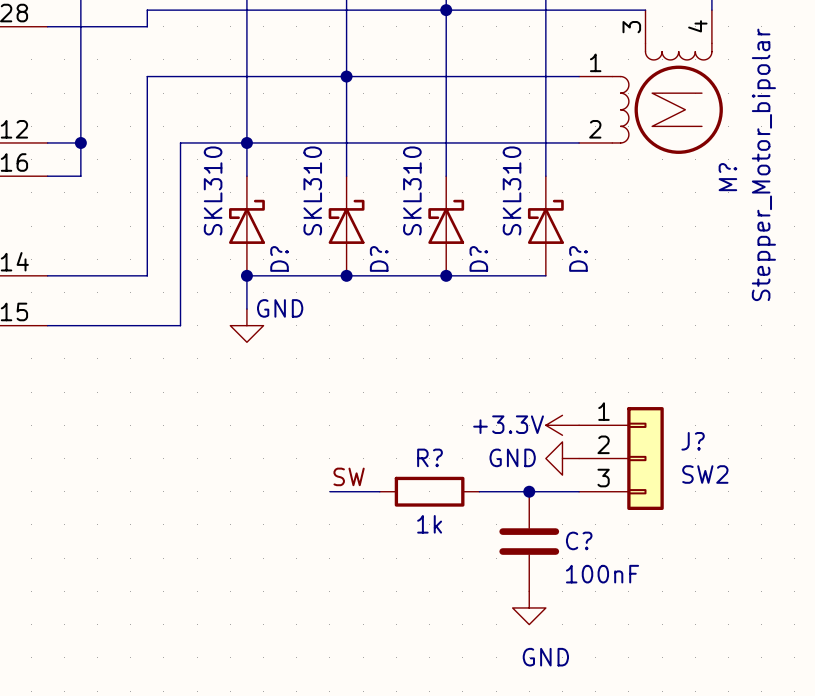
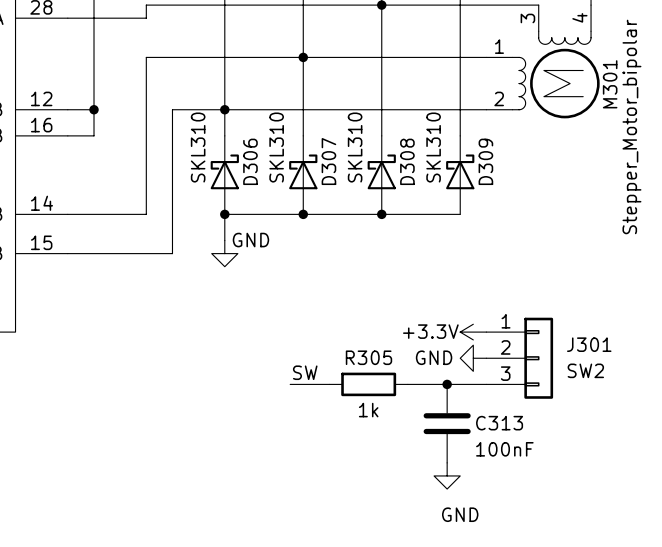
M? name: M? (727, 177) -> M301 (610, 84)
D? name: D? (279, 258) -> D306 (250, 161)
D? name: D? (379, 258) -> D307 (328, 161)
D? name: D? (478, 258) -> D308 (407, 161)
D? name: D? (578, 258) -> D309 (485, 161)
J? name: J? (693, 441) -> J301 (589, 344)
R? name: R? (430, 457) -> R305 (368, 357)
C? name: C? (579, 540) -> C313 (499, 423)

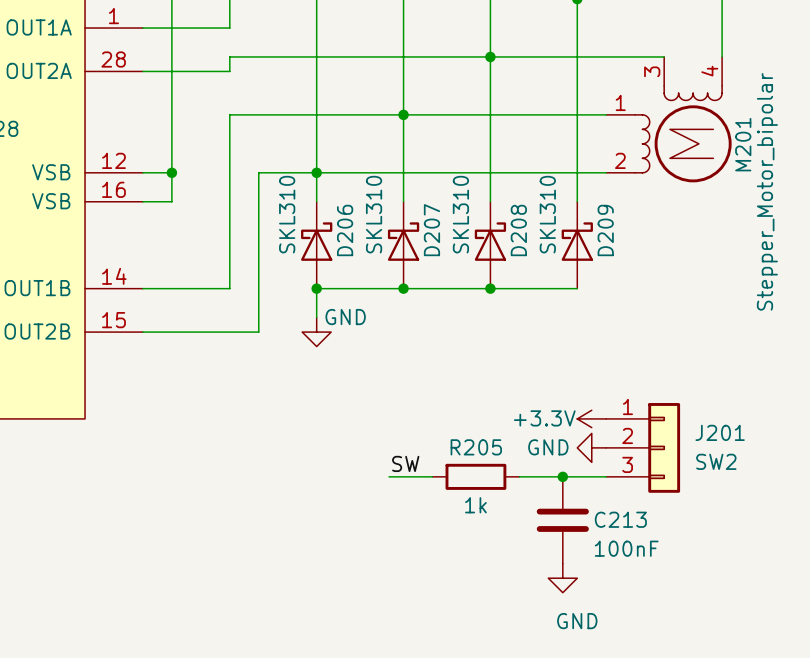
M301 name: M301 (610, 84) -> M201 (743, 144)
D306 name: D306 (250, 161) -> D206 (345, 230)
D307 name: D307 (328, 161) -> D207 (431, 230)
D308 name: D308 (407, 161) -> D208 (518, 230)
D309 name: D309 (485, 161) -> D209 (605, 230)
J301 name: J301 (589, 344) -> J201 (720, 432)
R305 name: R305 (368, 357) -> R205 (476, 447)
C313 name: C313 (499, 423) -> C213 (620, 519)

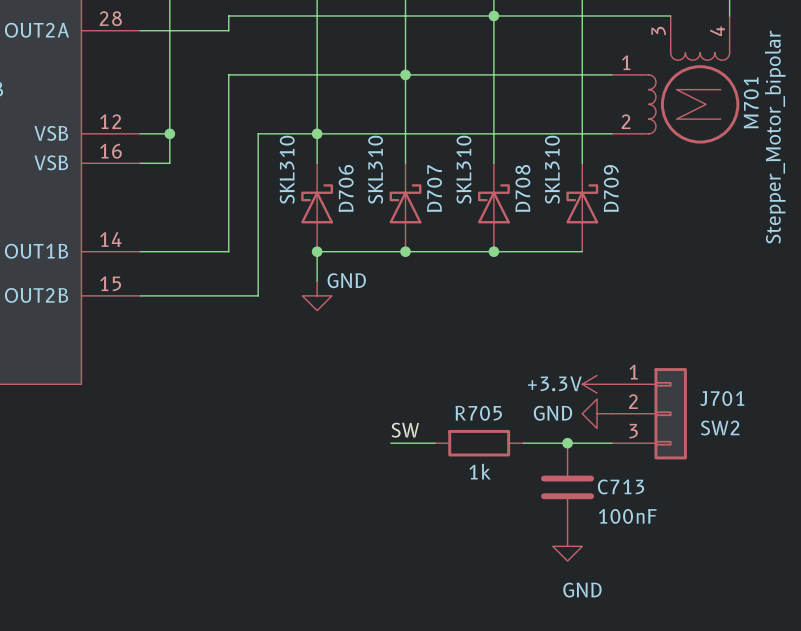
M201 name: M201 (743, 144) -> M701 (751, 102)
D206 name: D206 (345, 230) -> D706 (346, 188)
D207 name: D207 (431, 230) -> D707 (434, 188)
D208 name: D208 (518, 230) -> D708 (522, 188)
D209 name: D209 (605, 230) -> D709 (611, 188)
J201 name: J201 (720, 432) -> J701 (722, 398)
R205 name: R205 (476, 447) -> R705 (478, 413)
C213 name: C213 (620, 519) -> C713 (621, 486)

